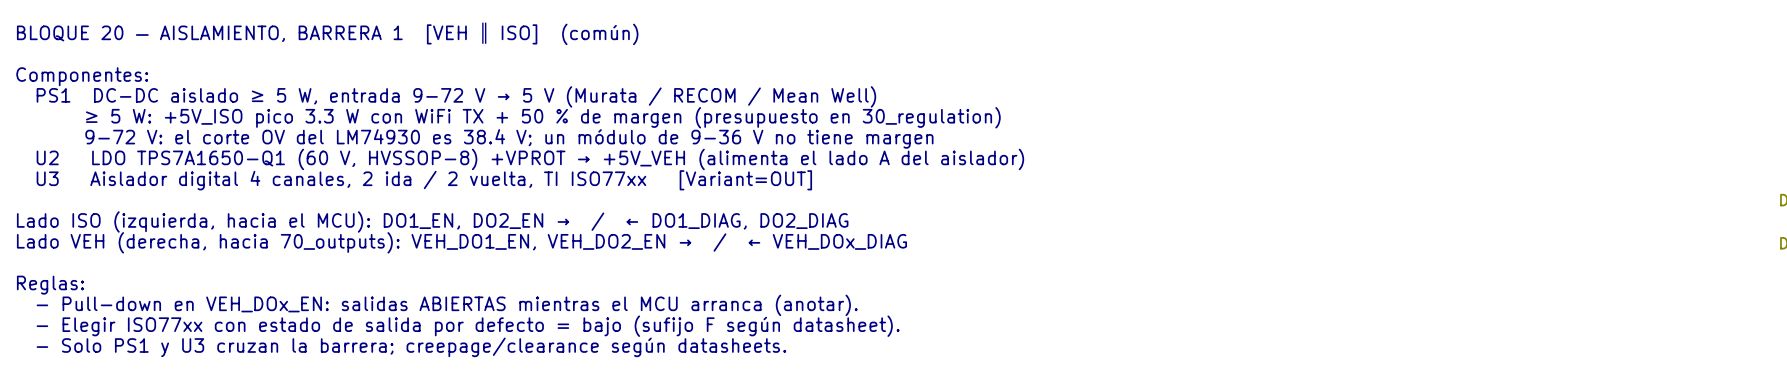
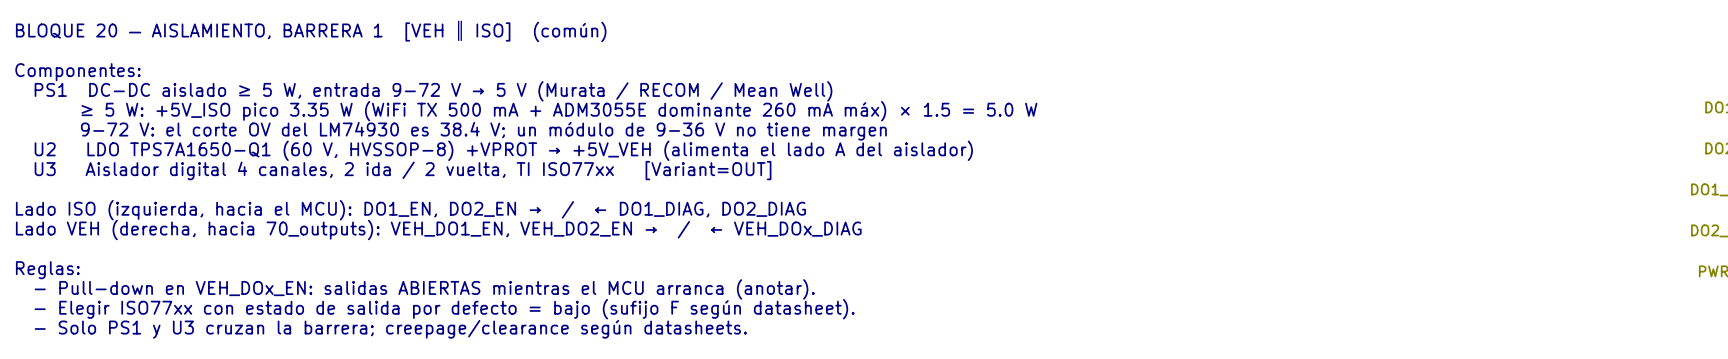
text: ≥ 5 W: +5V_ISO pico 3.3 W con WiFi TX + 50 % de margen (presupuesto en 30_regulation) (543, 117) -> ≥ 5 W: +5V_ISO pico 3.35 W (WiFi TX 500 mA + ADM3055E dominante 260 mA máx) × 1.5 = 5.0 W (559, 111)

